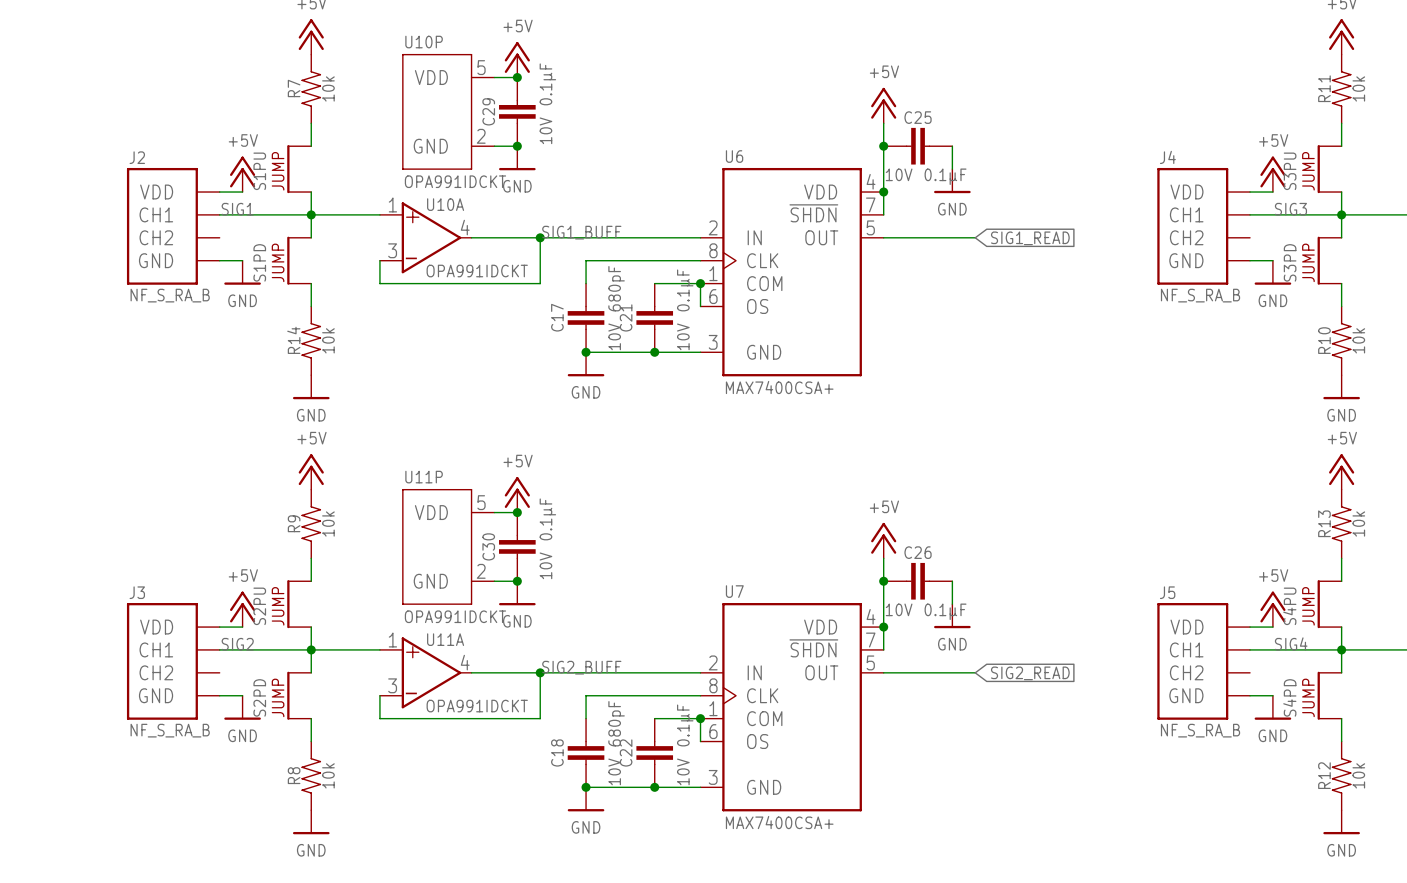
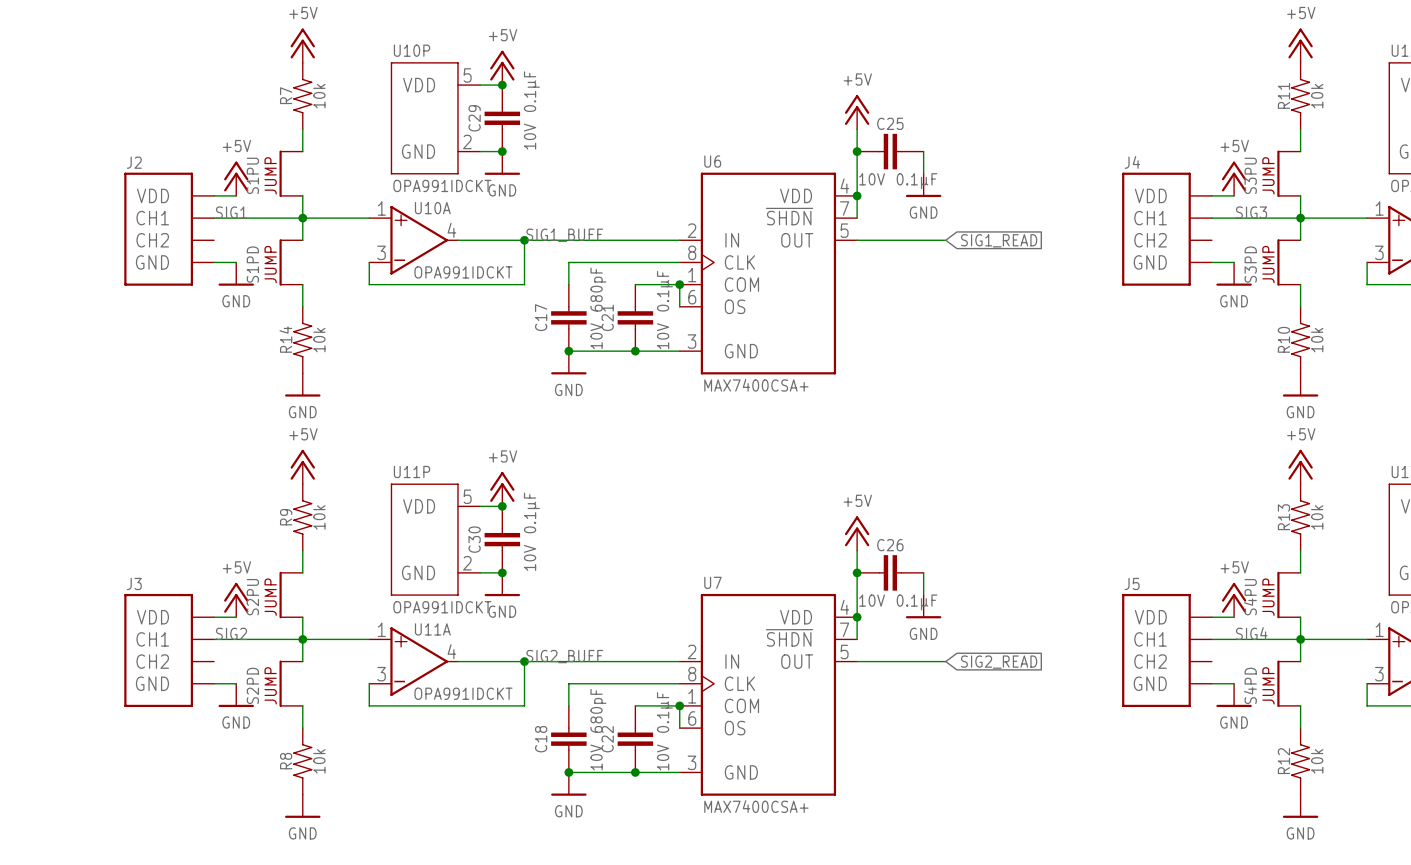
J2 text: NF_S_RA_B (170, 295) -> none
J4 text: NF_S_RA_B (1200, 295) -> none
J3 text: NF_S_RA_B (170, 730) -> none
J5 text: NF_S_RA_B (1200, 730) -> none

